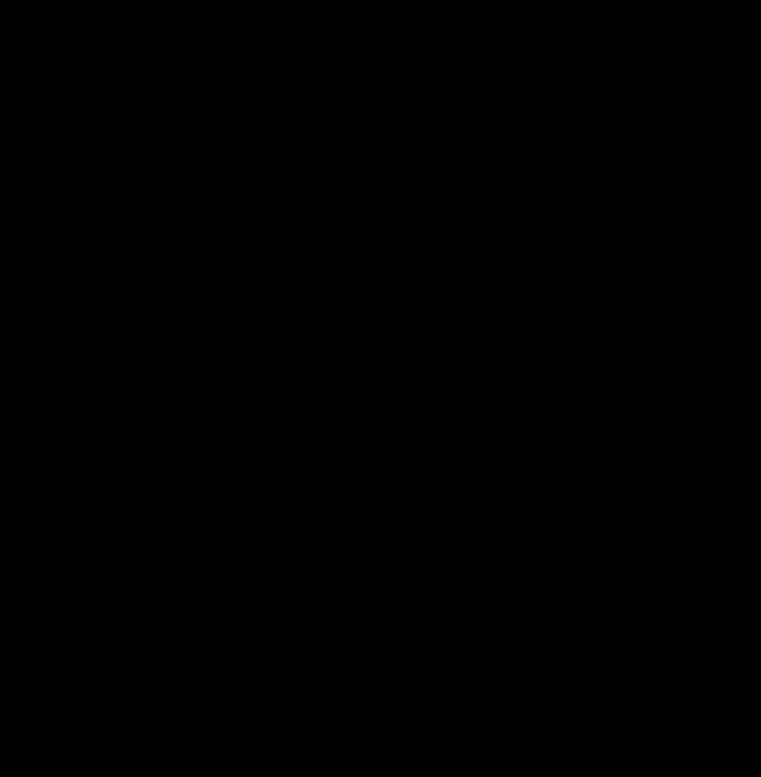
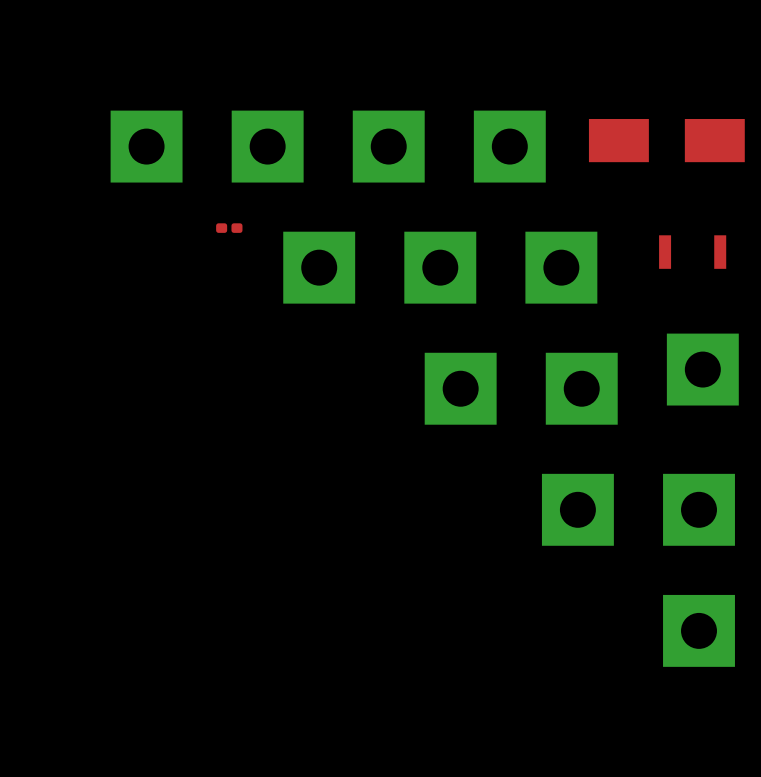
part: none -> (666, 140)
part: none -> (146, 146)
part: none -> (267, 146)
part: none -> (388, 146)
part: none -> (509, 146)
part: none -> (229, 228)
part: none -> (692, 252)
part: none -> (319, 267)
part: none -> (440, 267)
part: none -> (561, 267)
part: none -> (702, 369)
part: none -> (460, 388)
part: none -> (581, 388)
part: none -> (577, 509)
part: none -> (699, 509)
part: none -> (699, 630)

